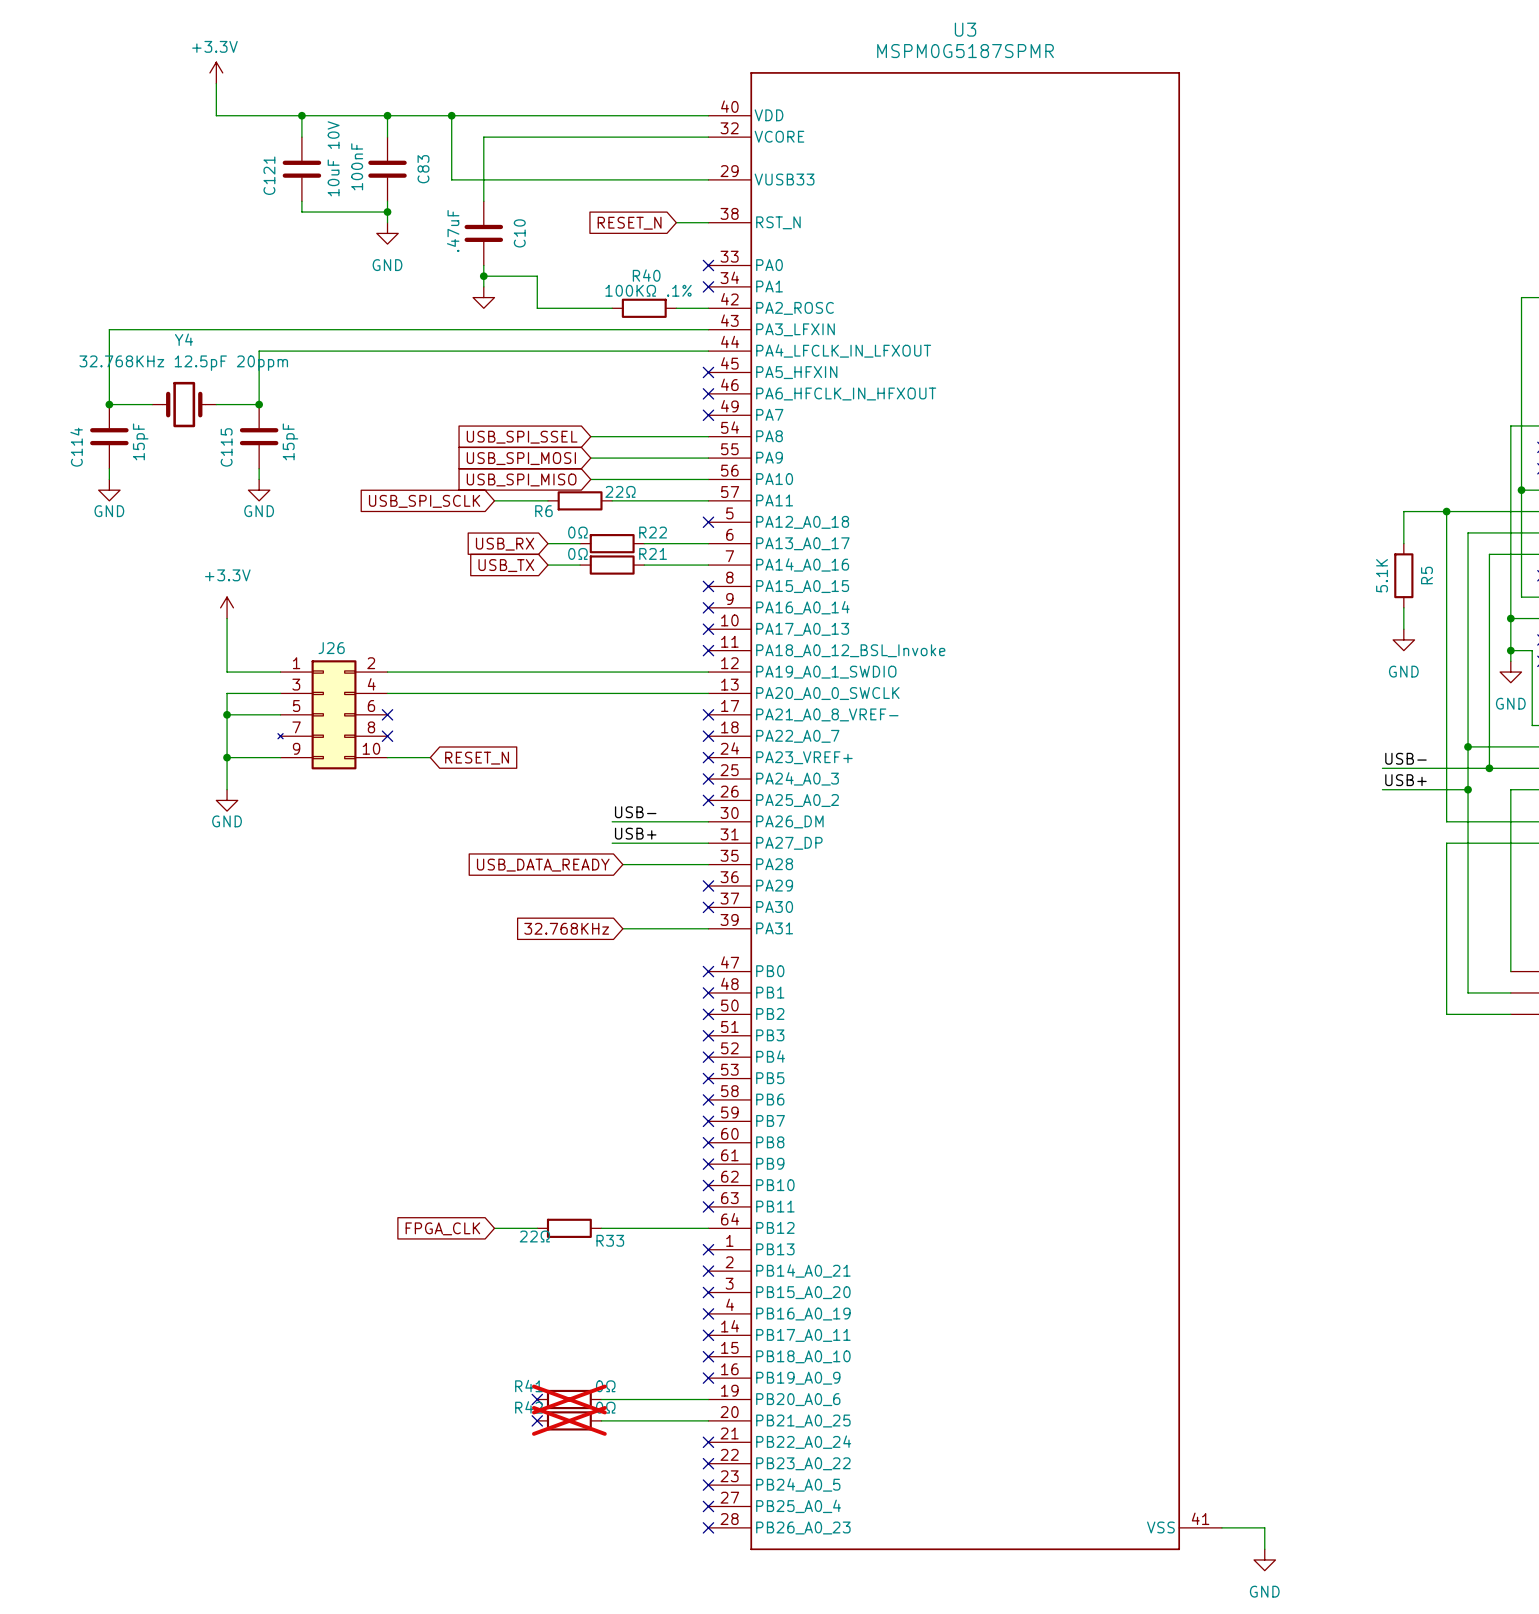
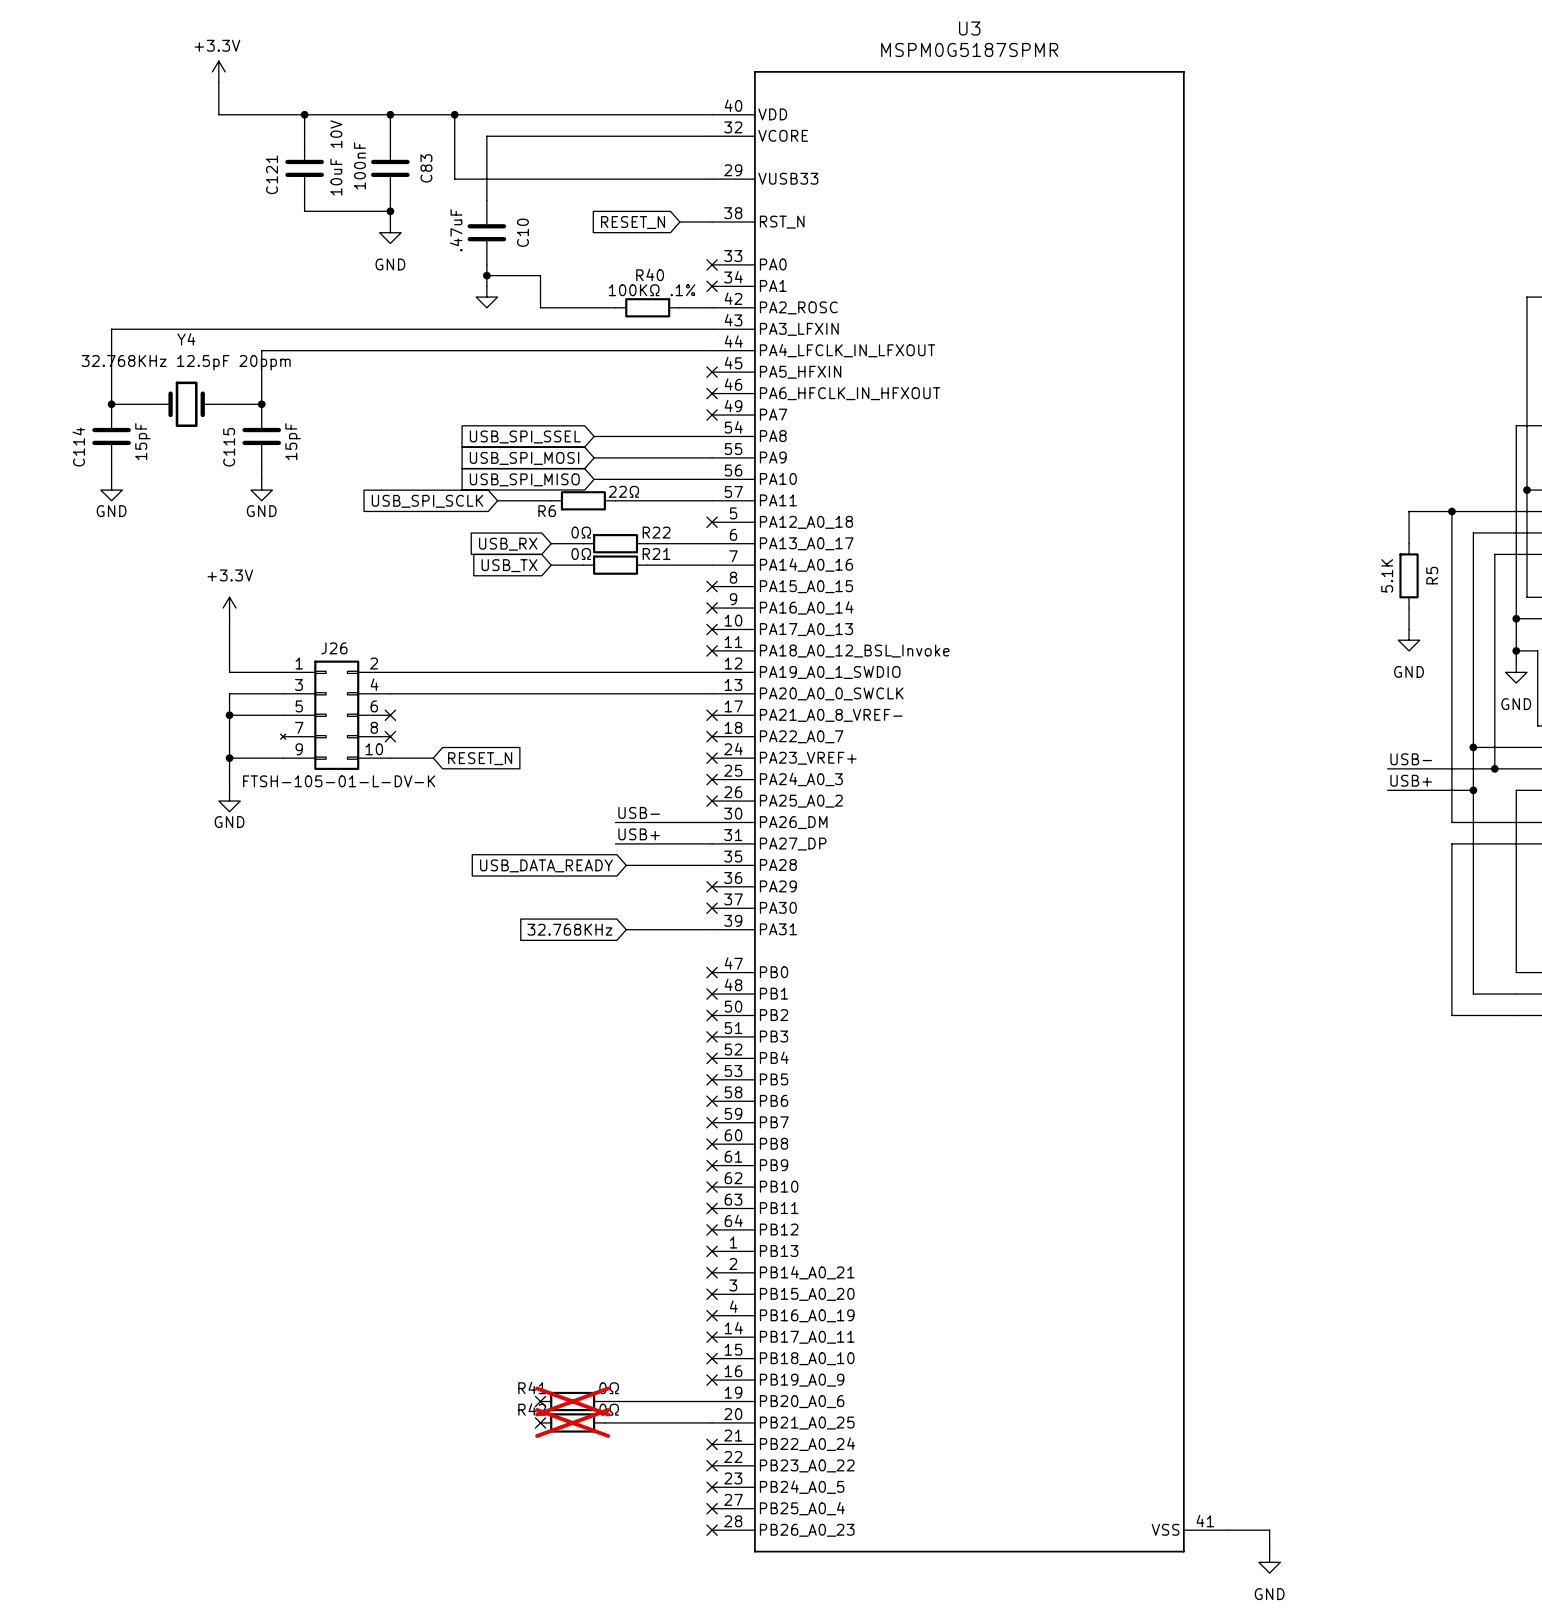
J26 value: none -> FTSH-105-01-L-DV-K (339, 781)
global label: FPGA_CLK (442, 1228) -> none
wire: (494, 1228) (537, 1228) -> none
R33: 22Ω (569, 1228) -> none
wire: (601, 1228) (708, 1228) -> none
no-connect mark: none -> (712, 1229)

